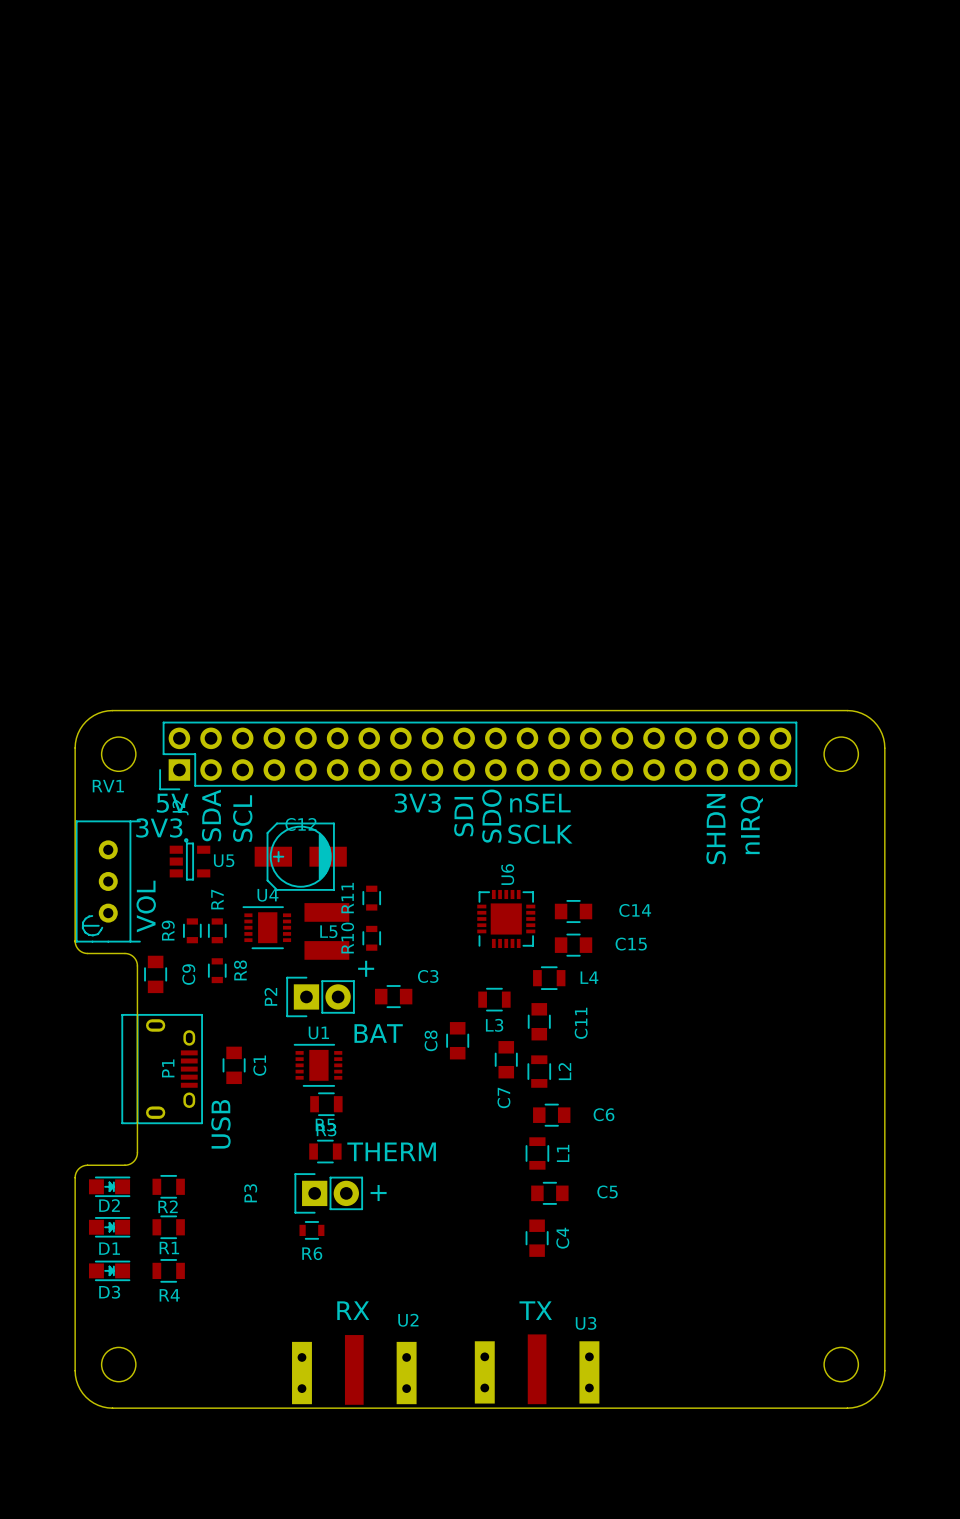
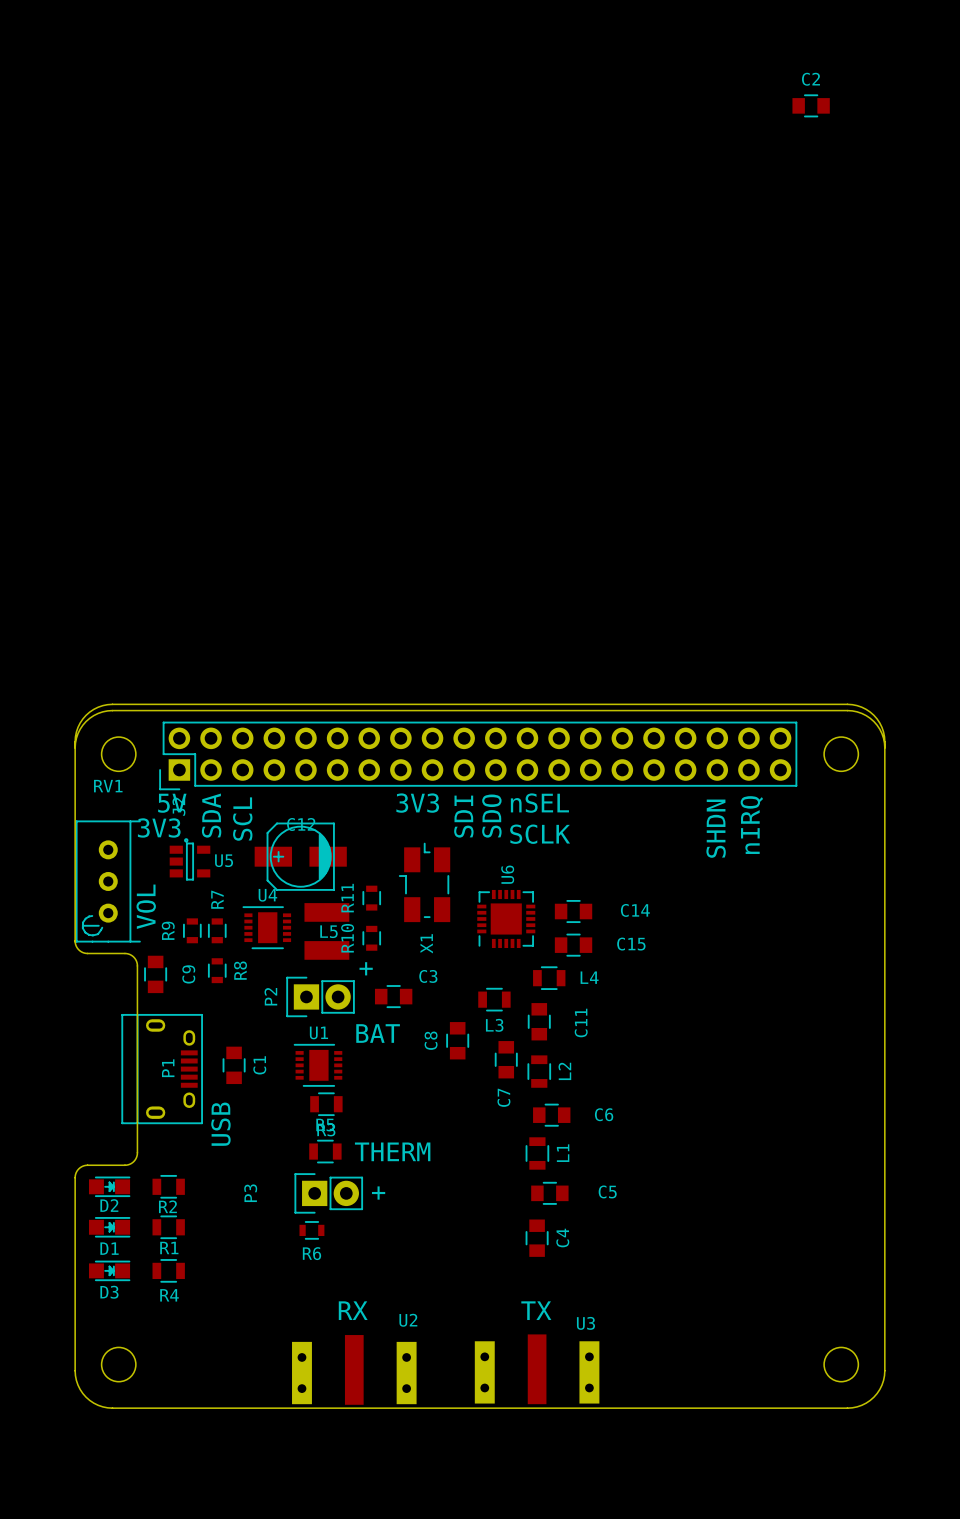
C2: none -> (811, 105)
board edge: none -> (75, 747) (76, 732) (82, 718) (98, 707) (112, 704) (847, 704) (861, 707) (877, 718) (883, 732) (884, 748)
X1: none -> (424, 882)

